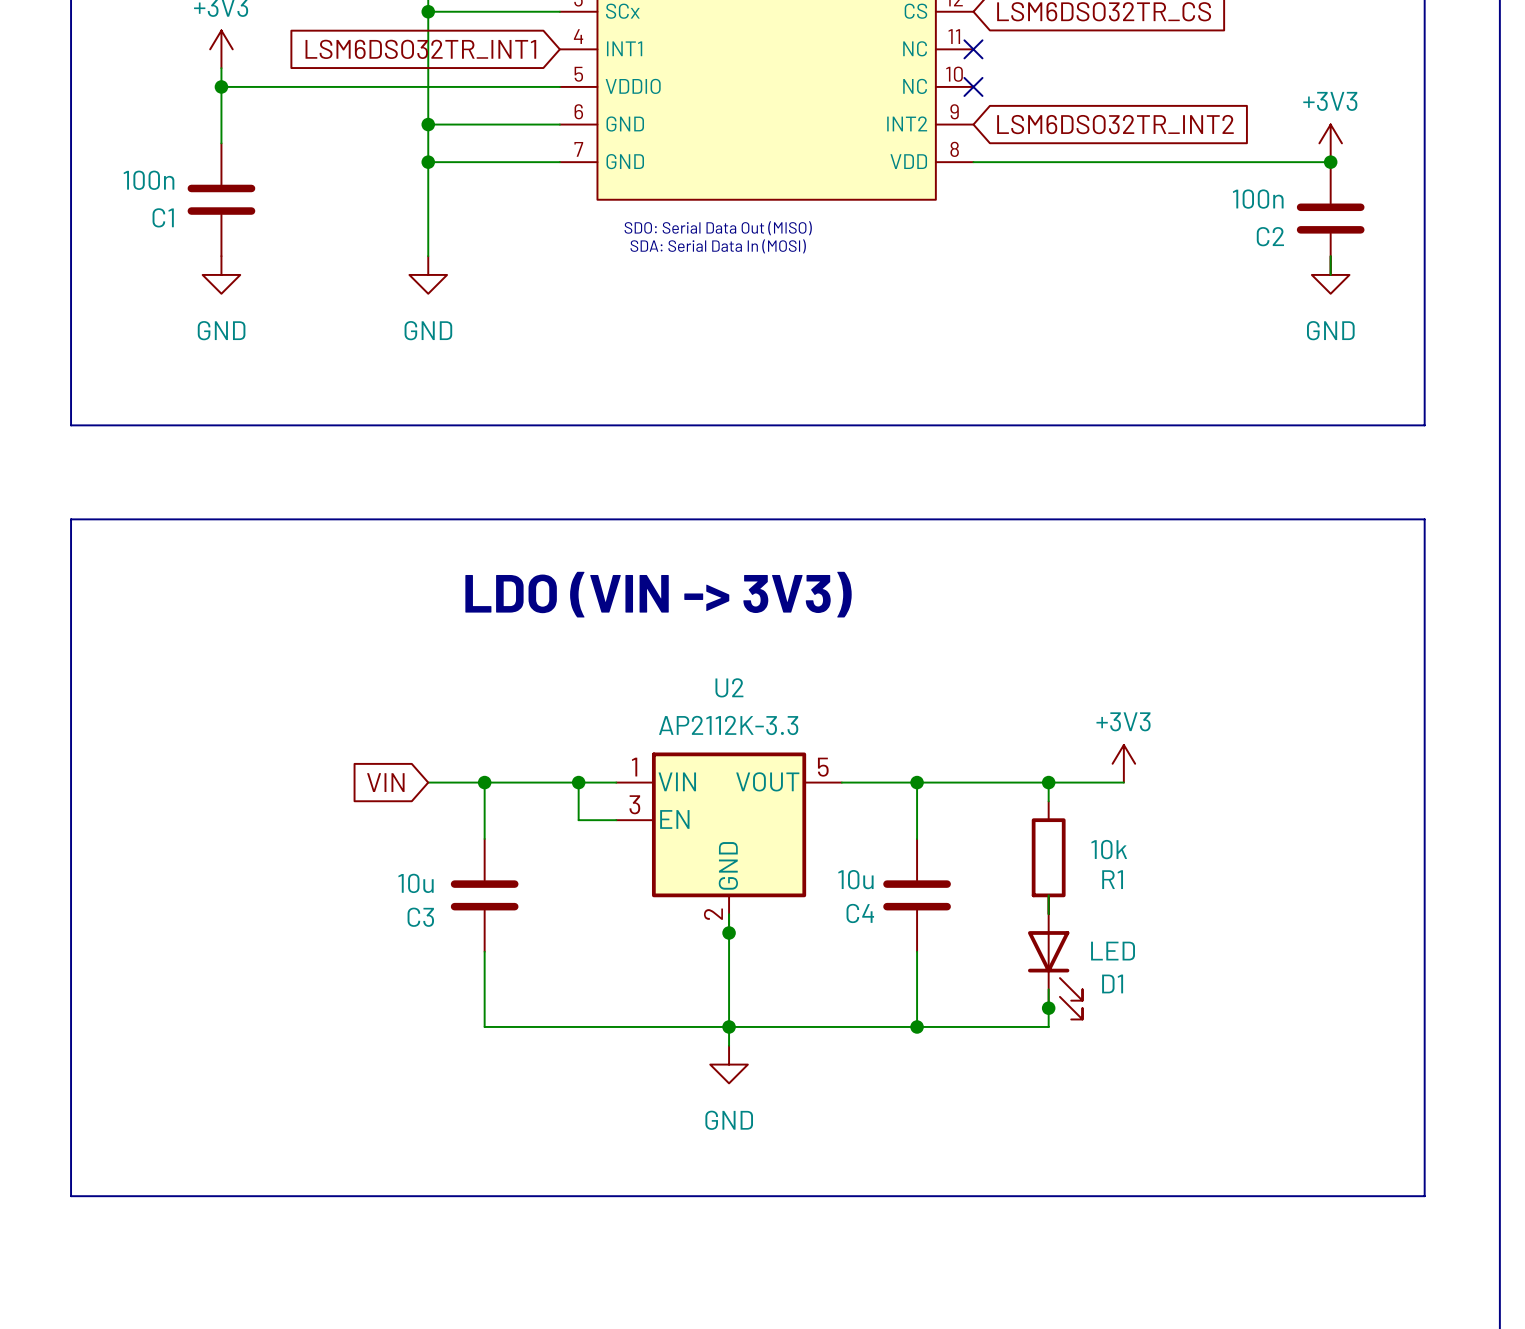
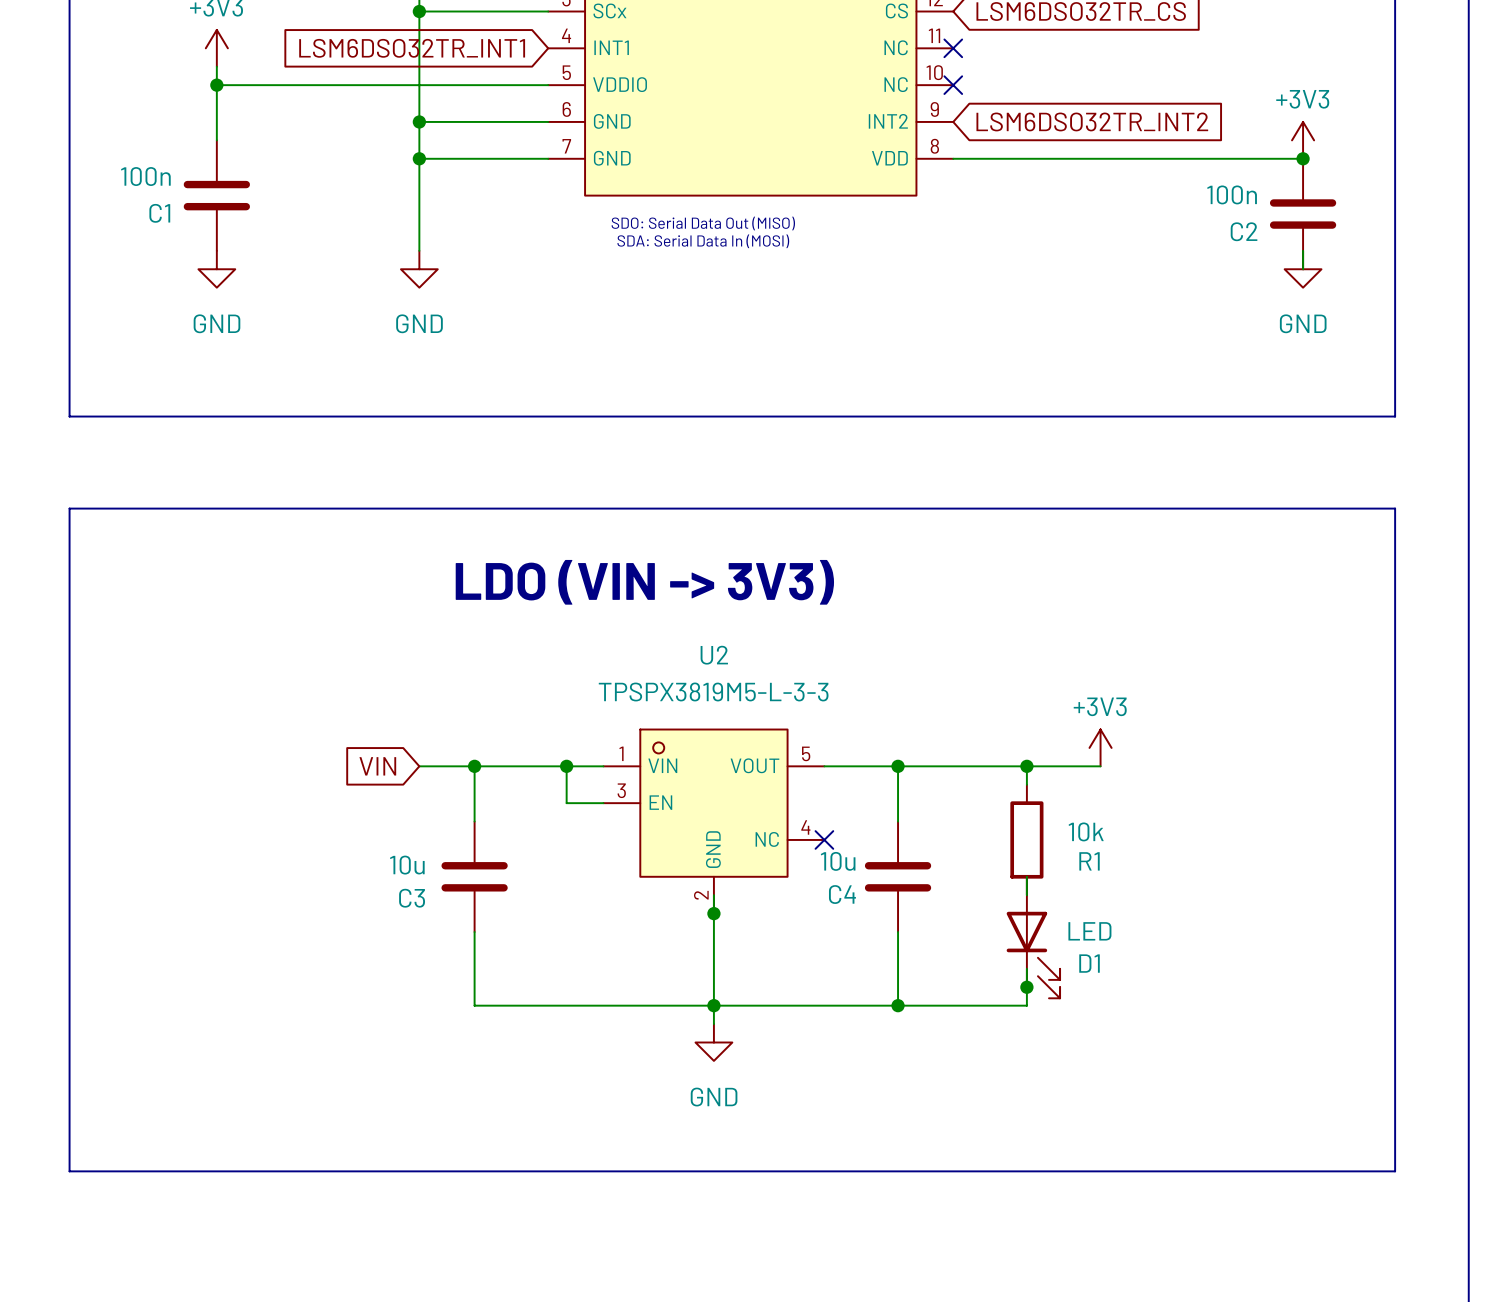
U2 value: AP2112K-3.3 (728, 725) -> TPSPX3819M5-L-3-3 (713, 691)
U2 symbol: [616, 752, 842, 933] -> [603, 729, 825, 914]
no-connect mark: none -> (824, 839)

